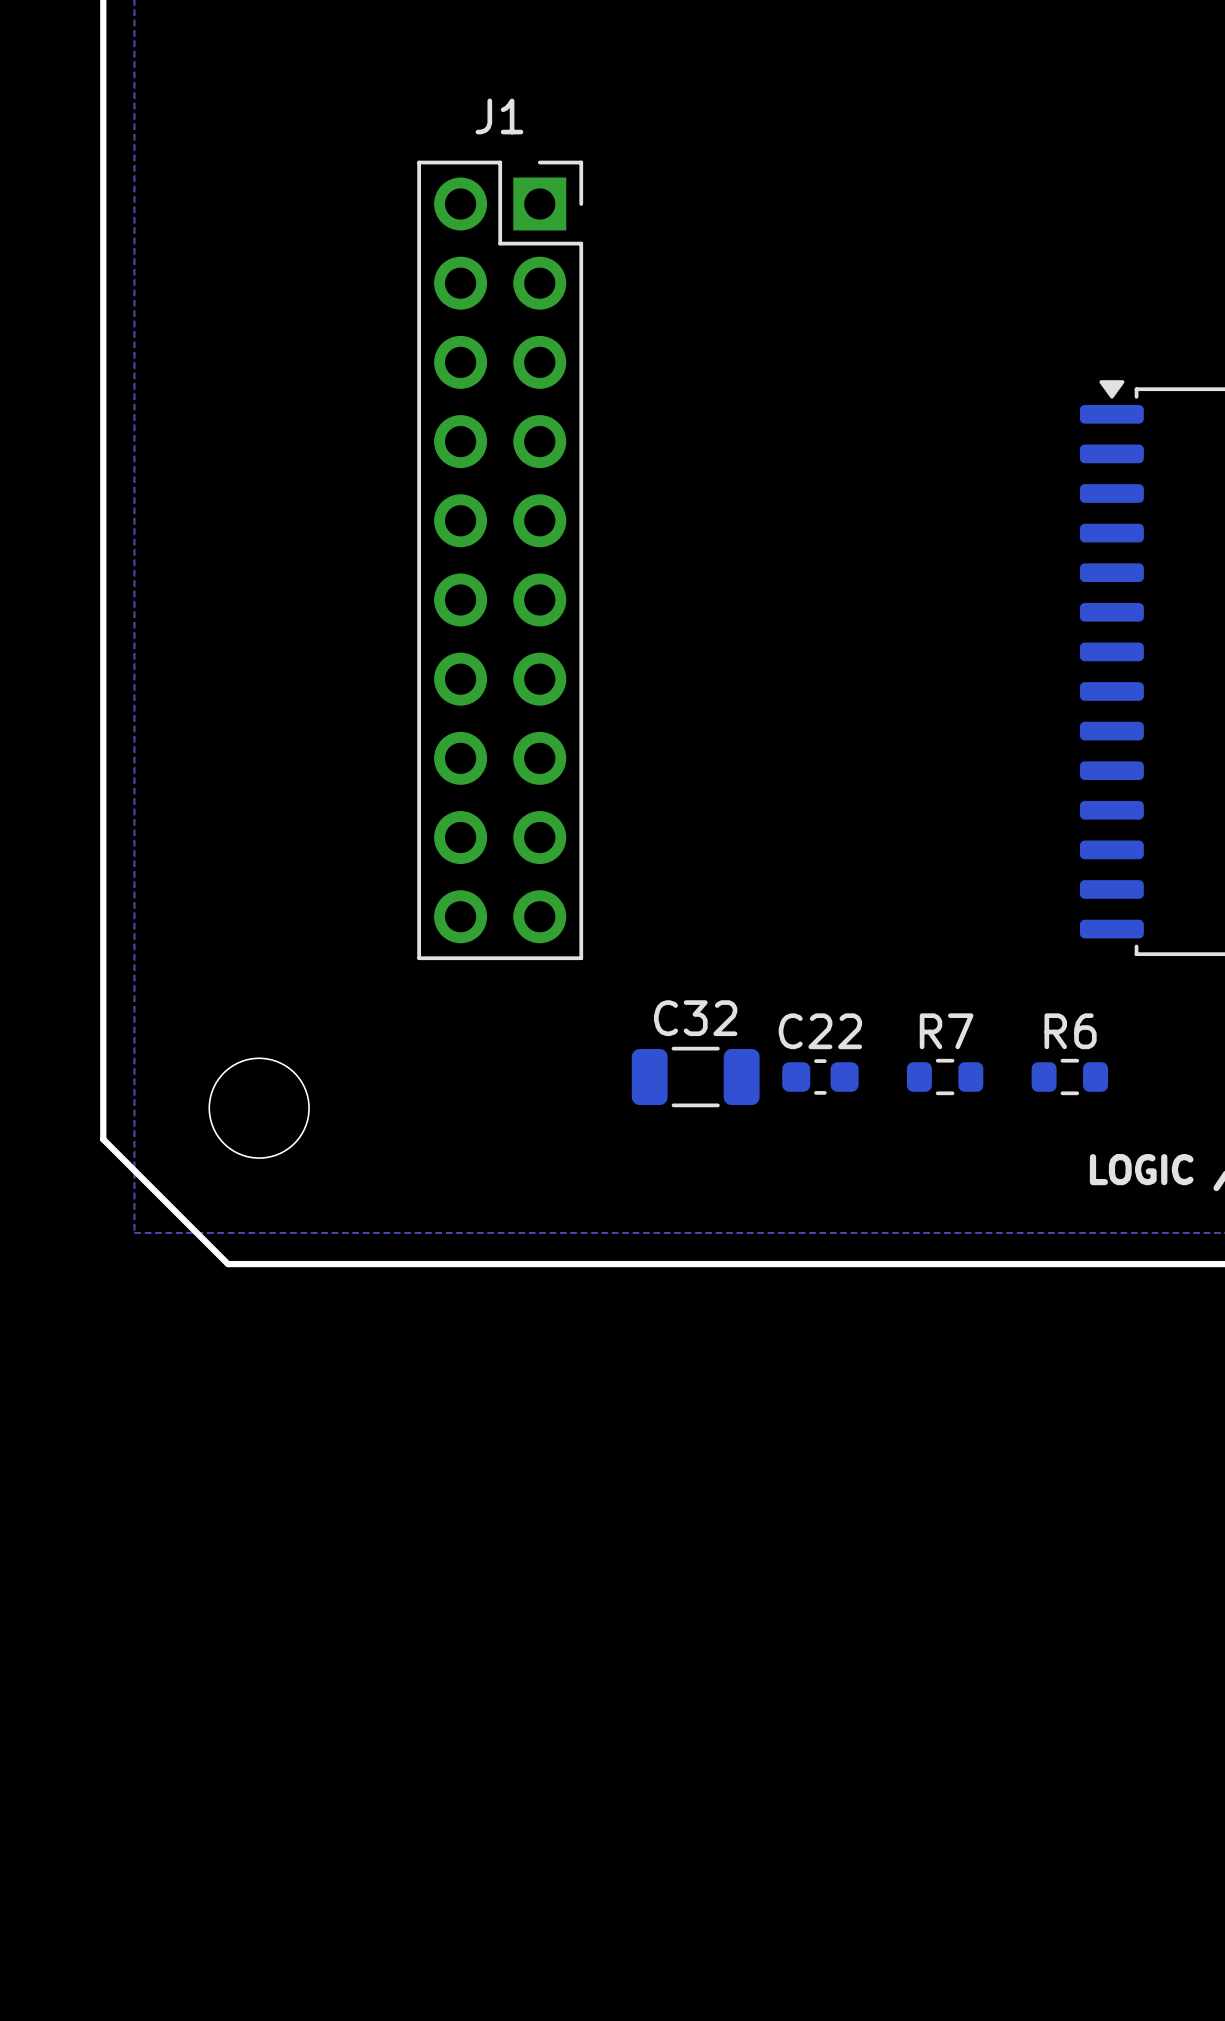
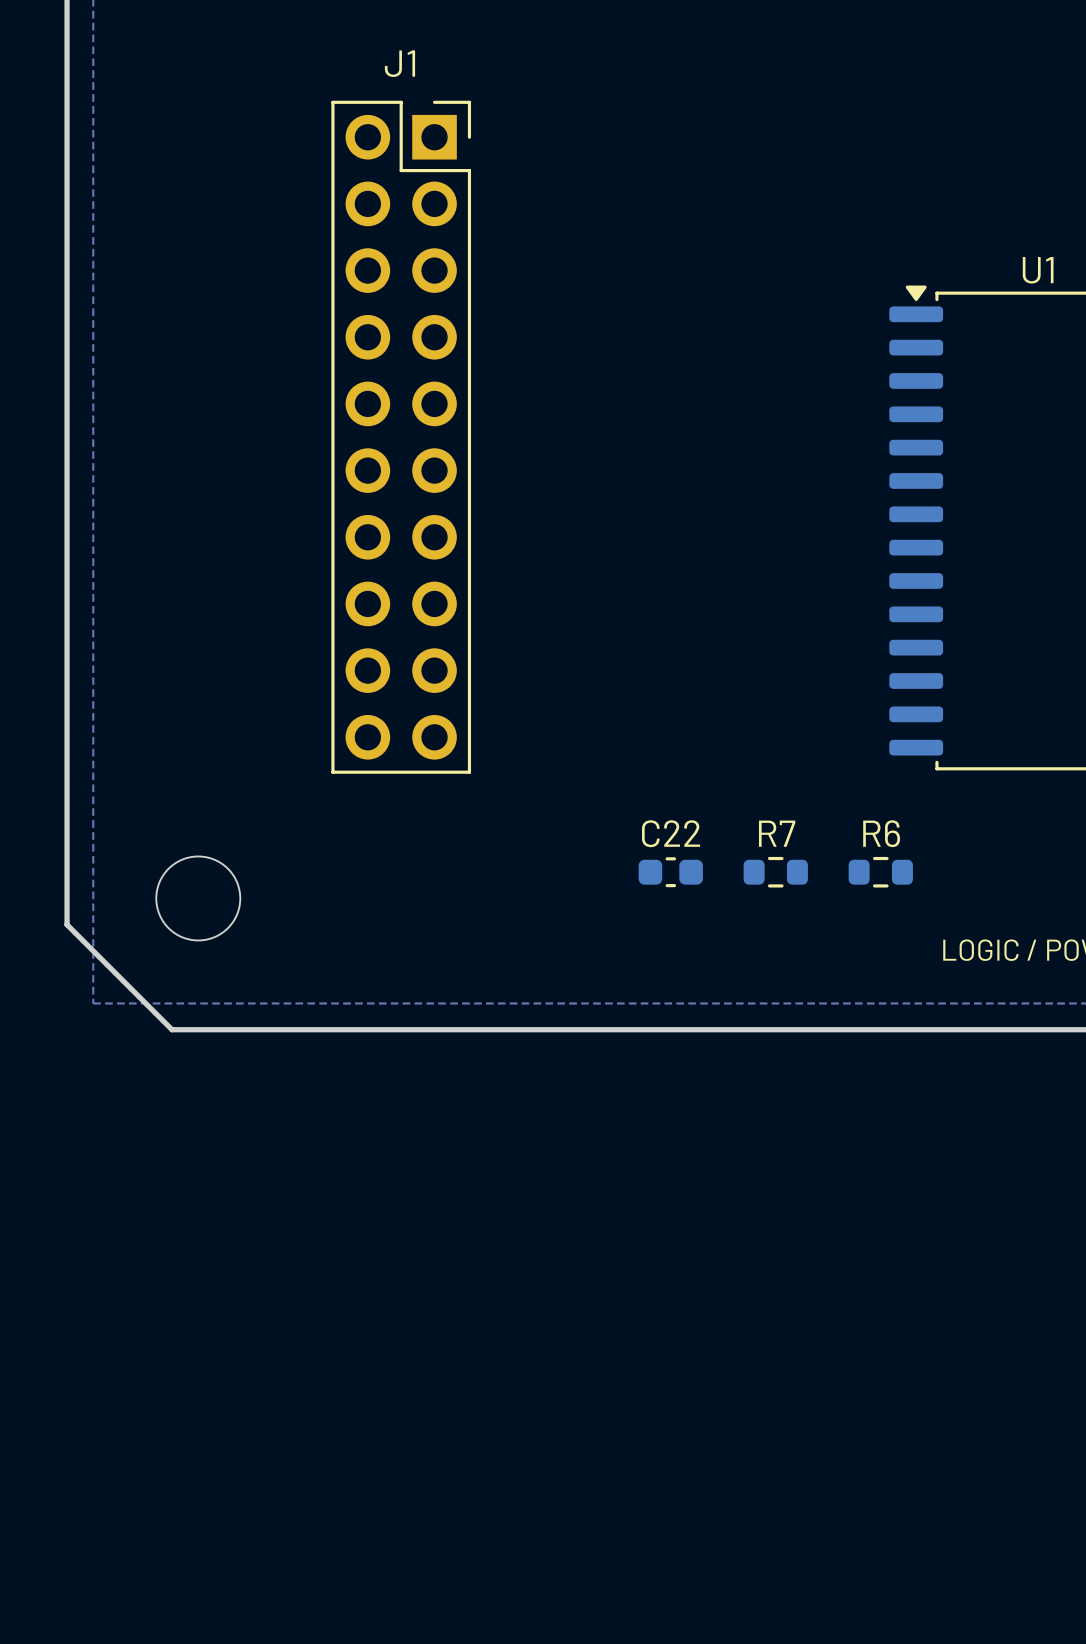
C32: (695, 1077) -> none

